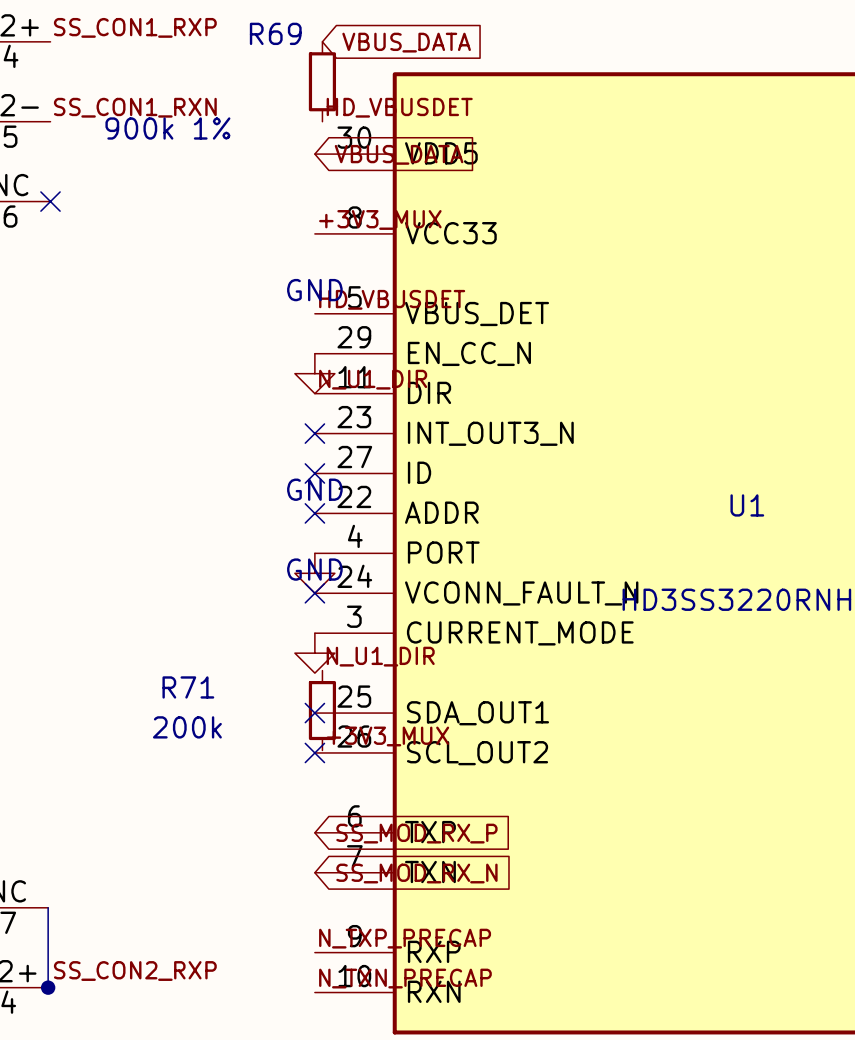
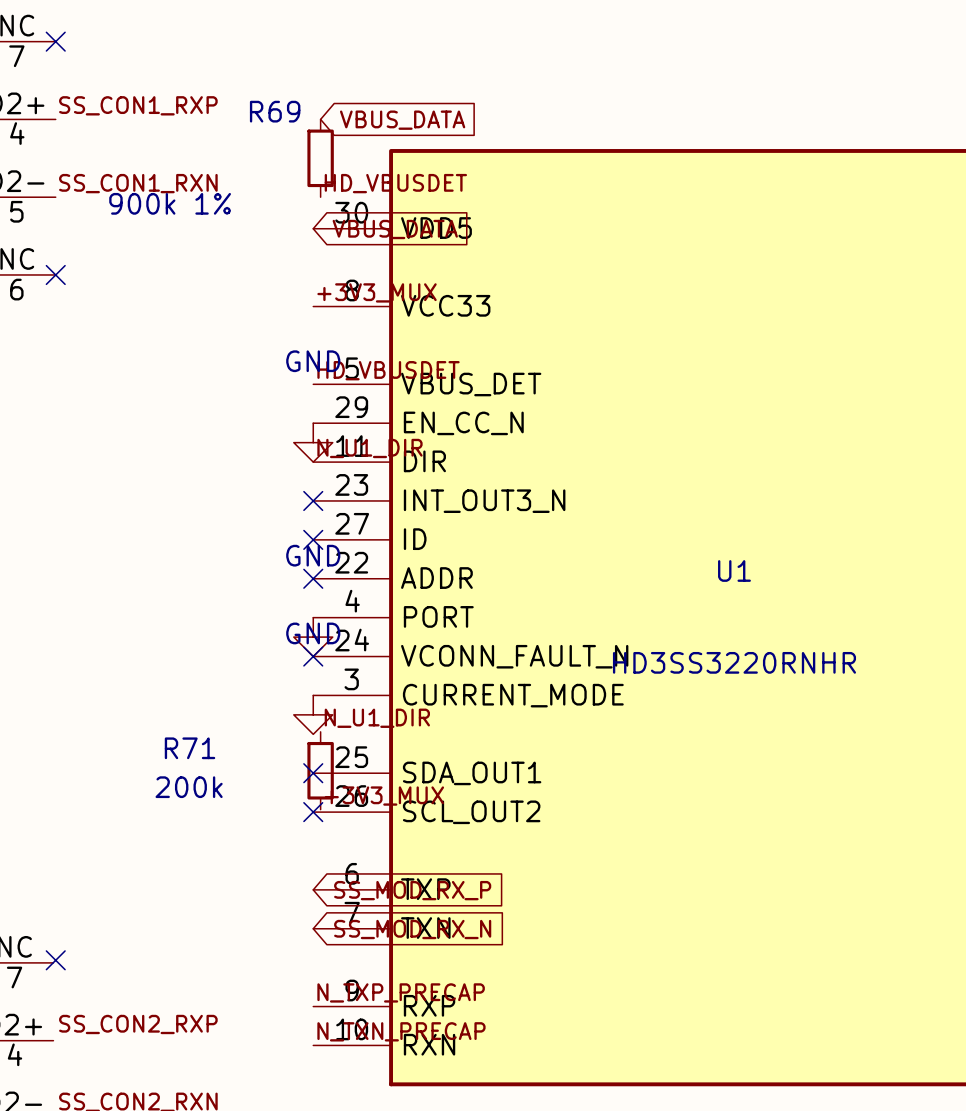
no-connect mark: none -> (55, 960)
wire: (48, 907) (48, 987) (50, 984) -> none
junction: (48, 987) -> none

